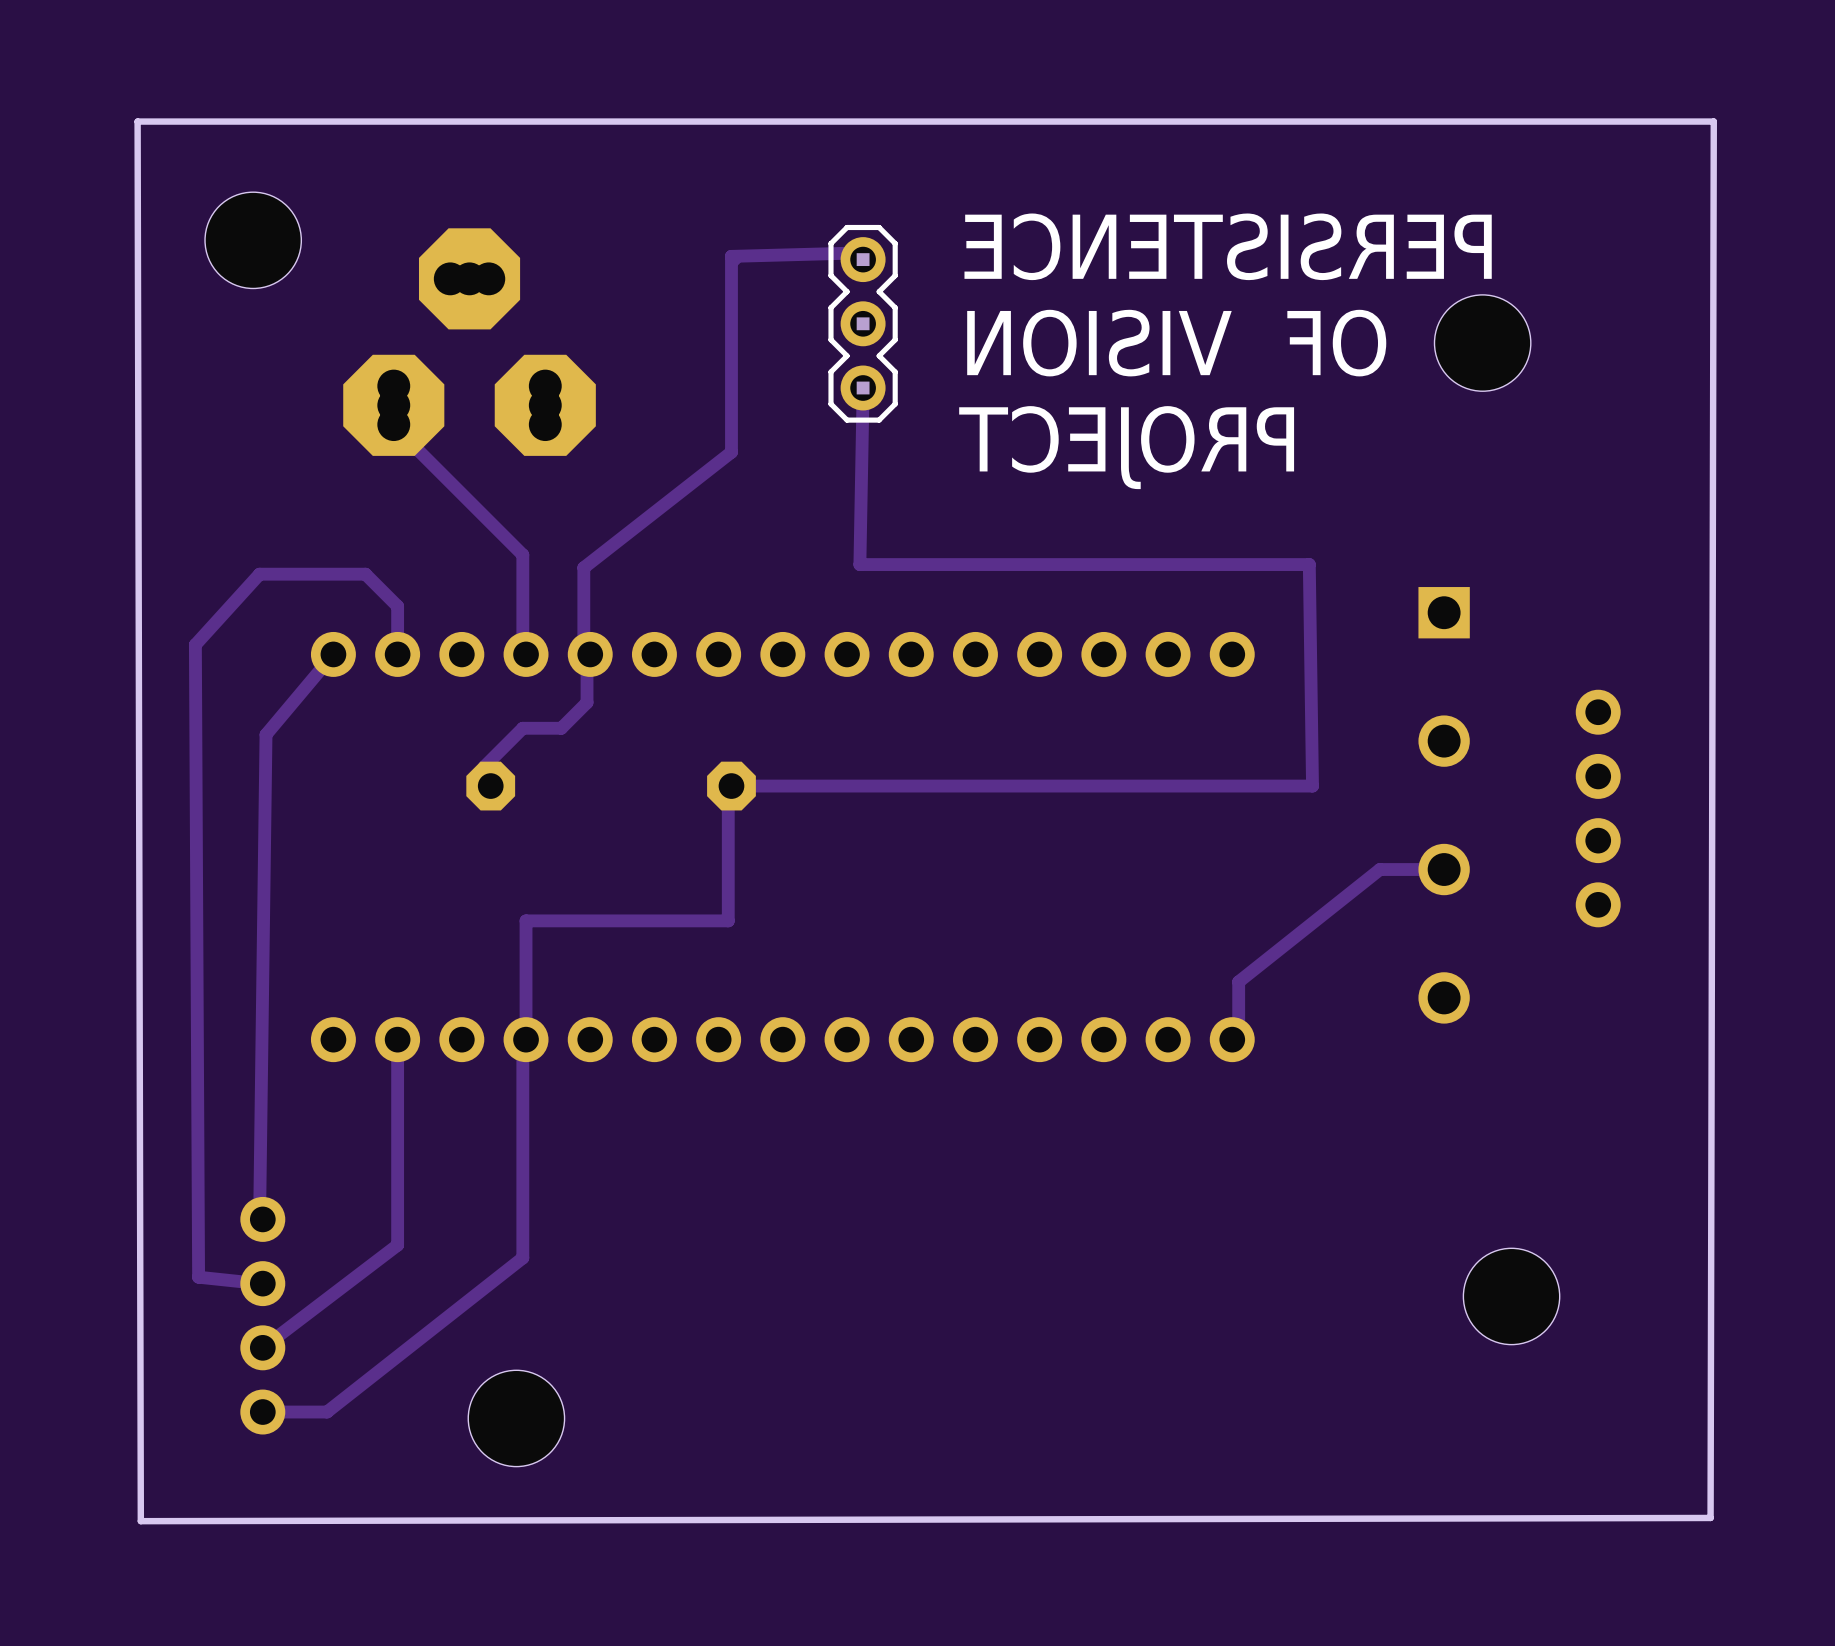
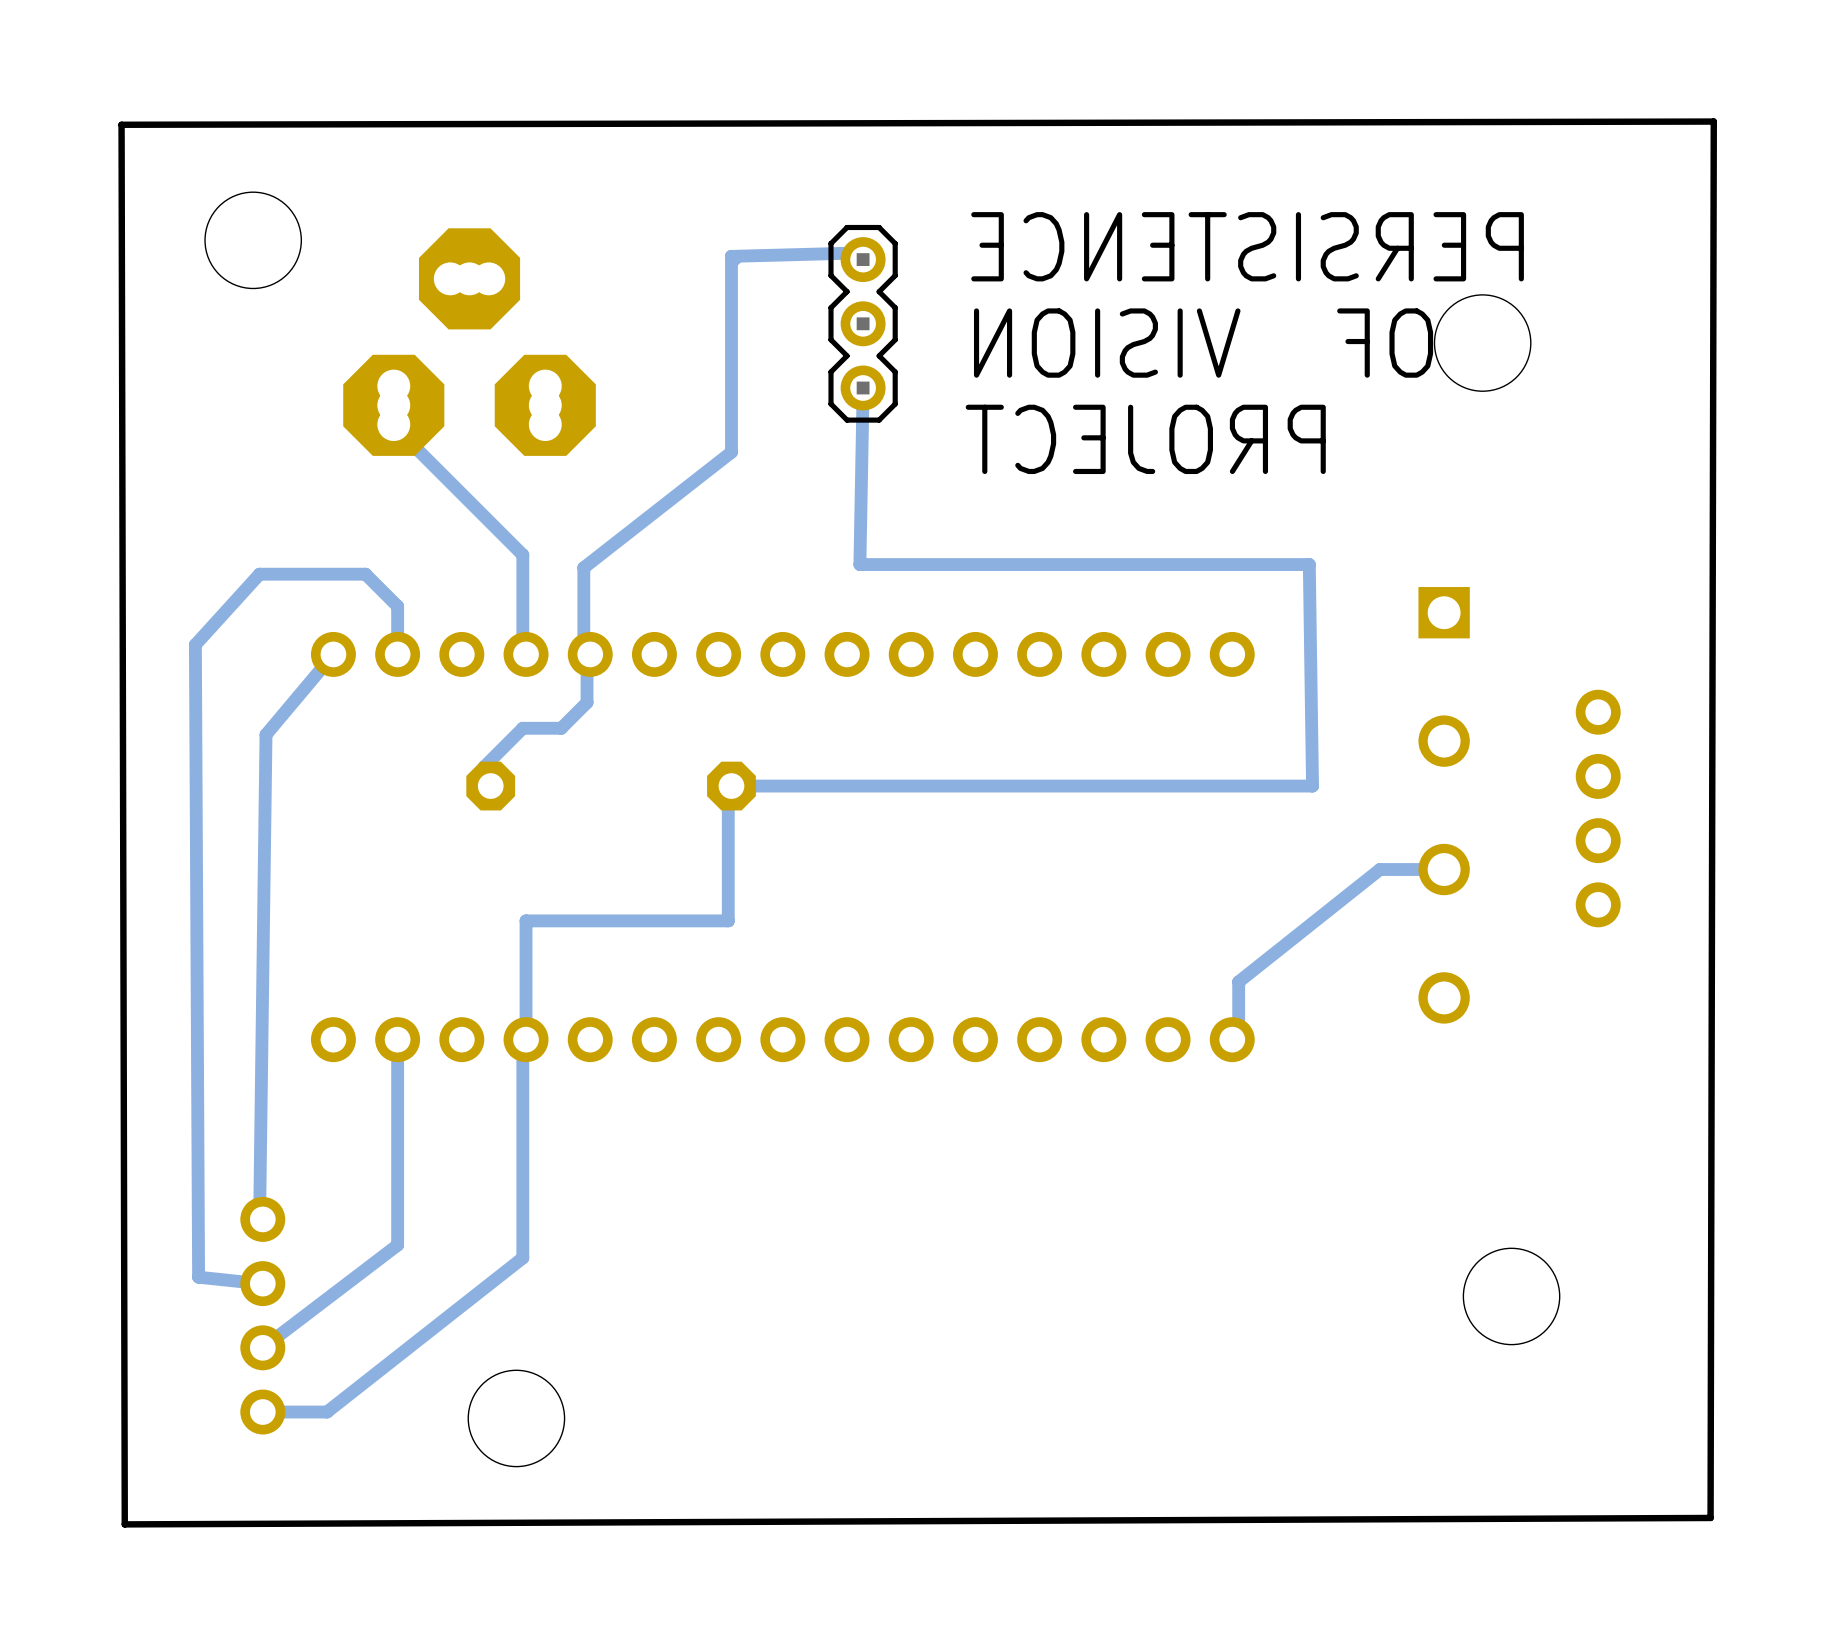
board edge: (1713, 121) (137, 121) (140, 1521) (1710, 1517) -> (1713, 121) (121, 124) (124, 1524) (1710, 1517)

